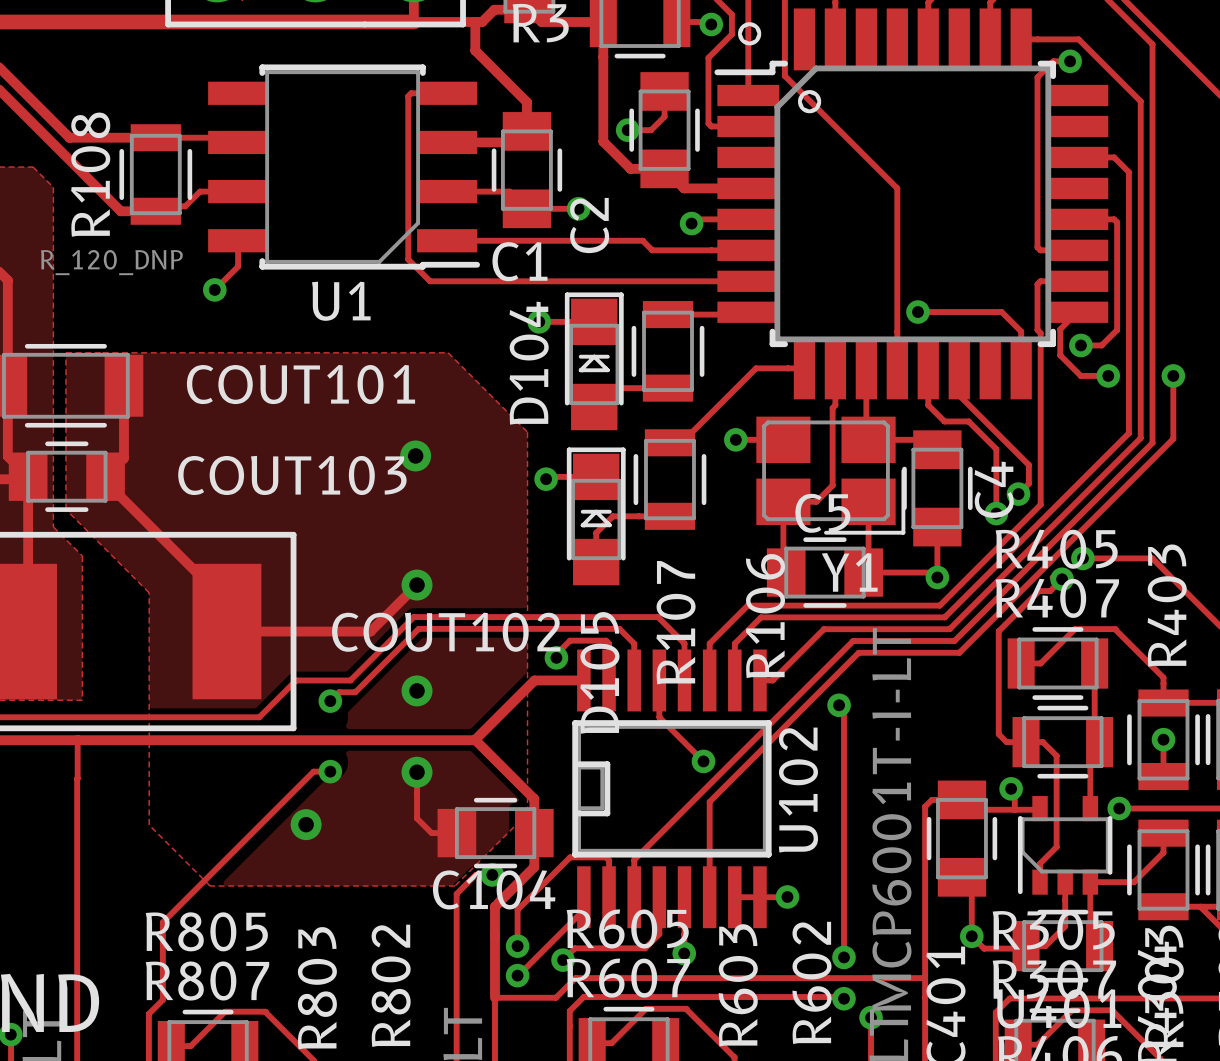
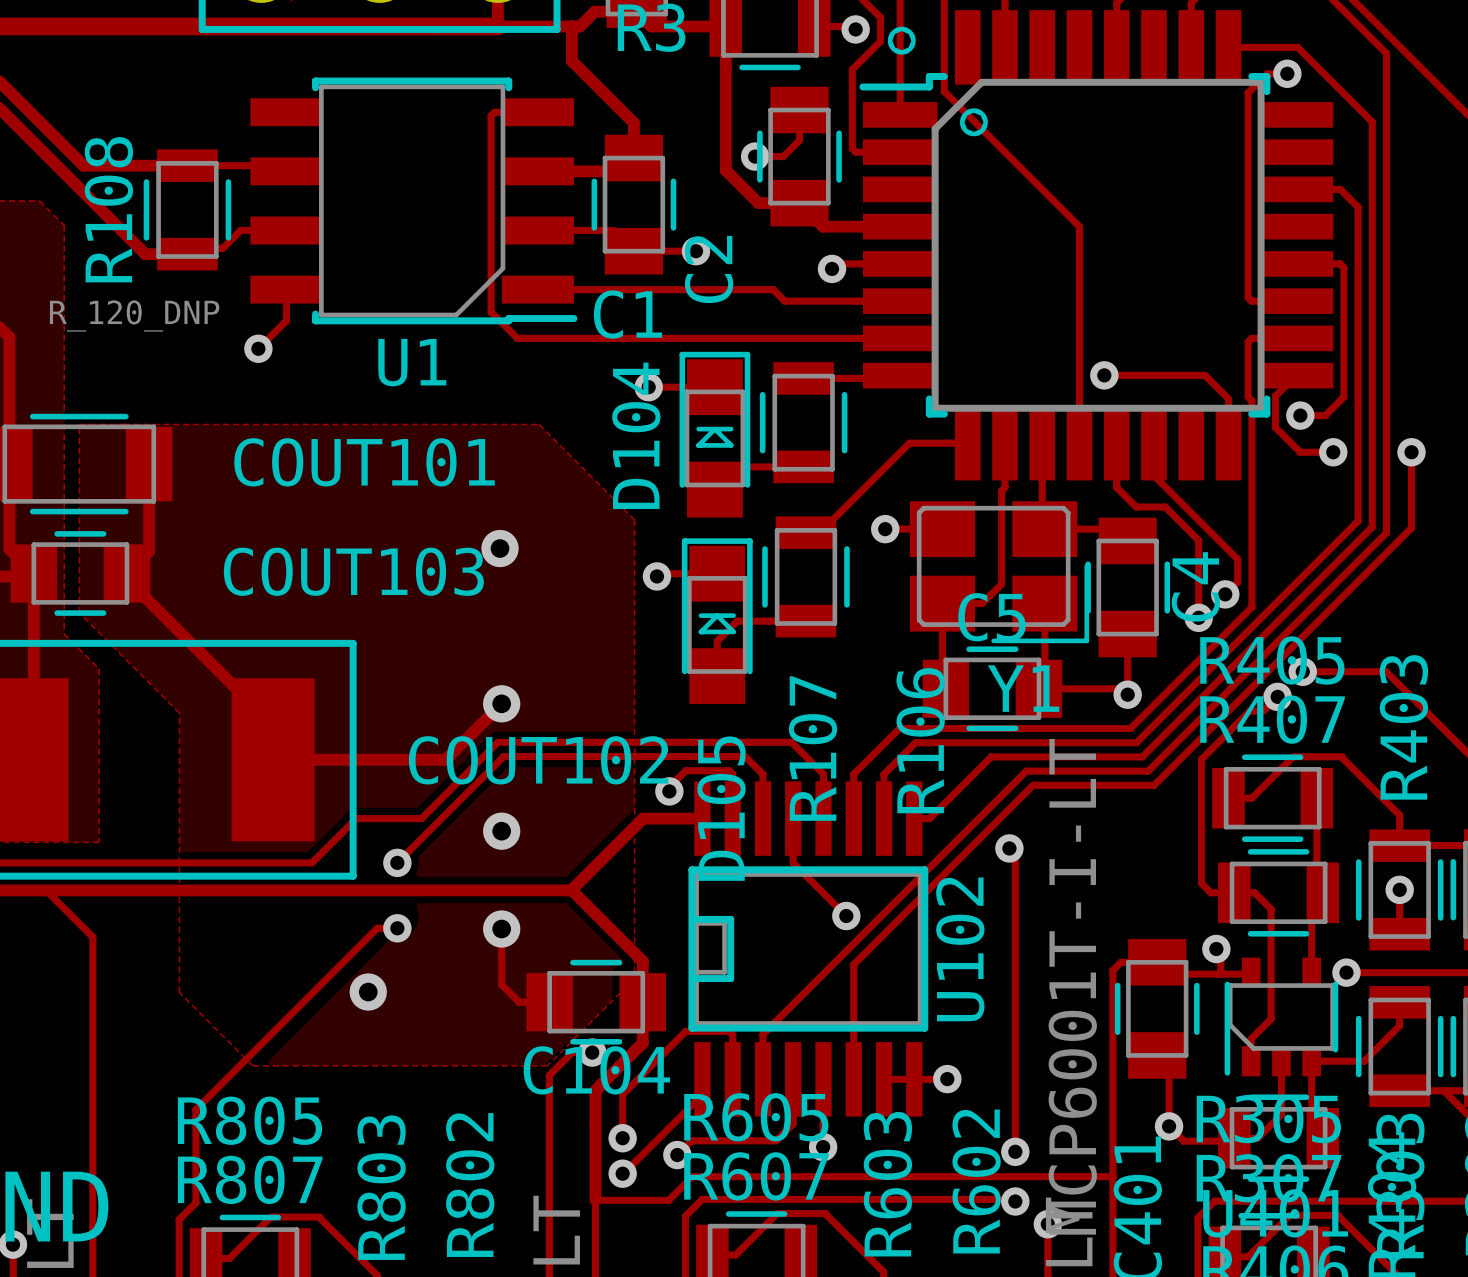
track: (355, 692) (339, 692) (330, 701) -> (427, 832) (397, 862)
via position: (330, 701) -> (397, 862)
track: (77, 740) (77, 778) -> (45, 890) (92, 937)

